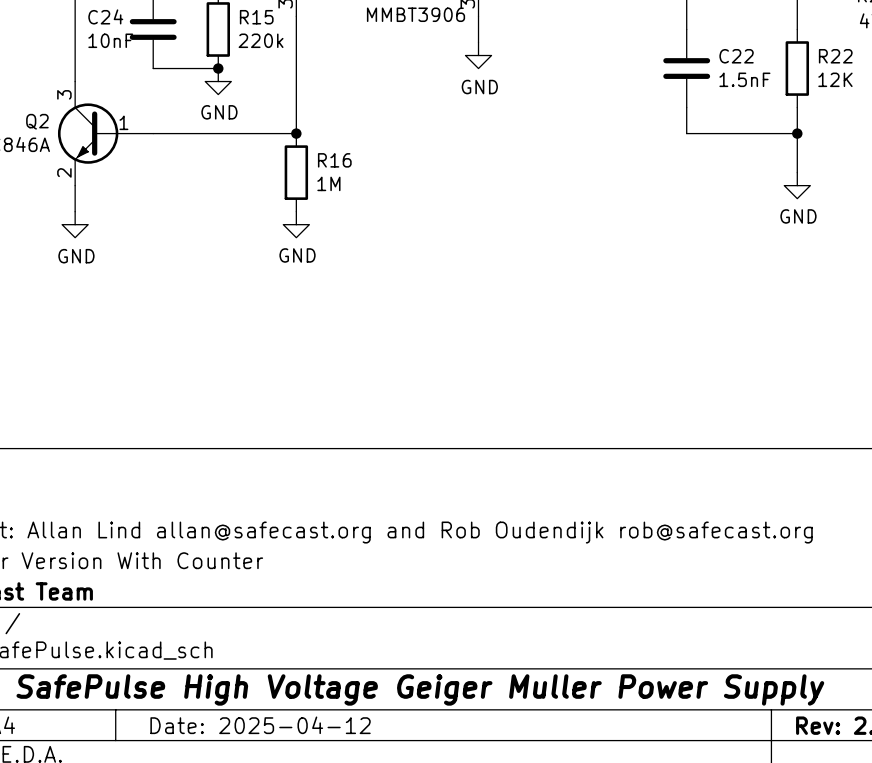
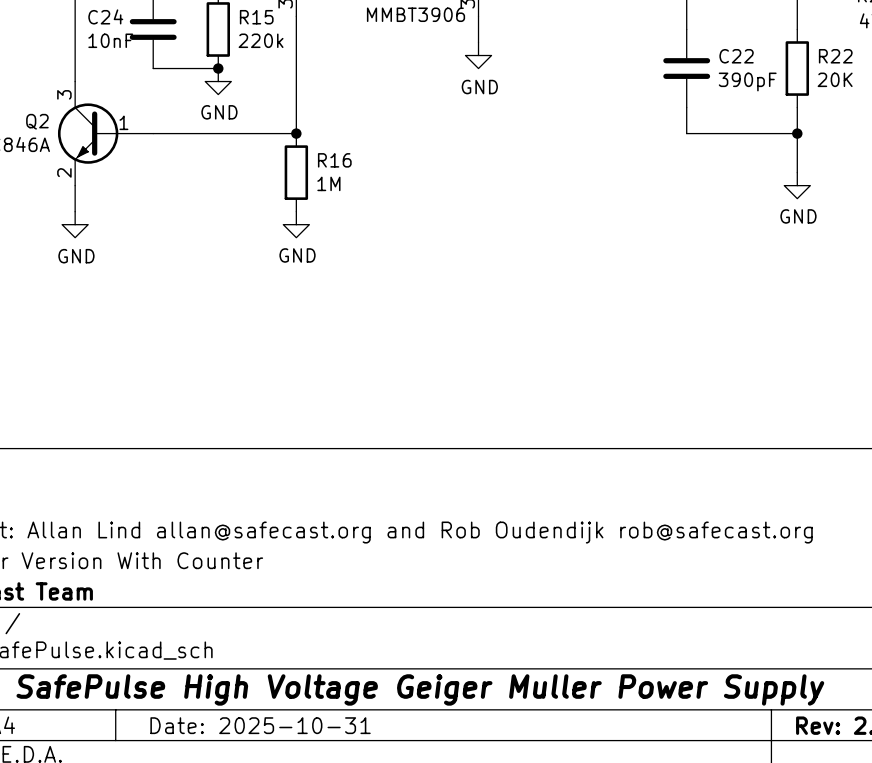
C22 value: 1.5nF (744, 79) -> 390pF (747, 81)
R22 value: 12K (835, 79) -> 20K (835, 79)
title block: Date: 2025-04-12 (260, 725) -> Date: 2025-10-31 (260, 725)

